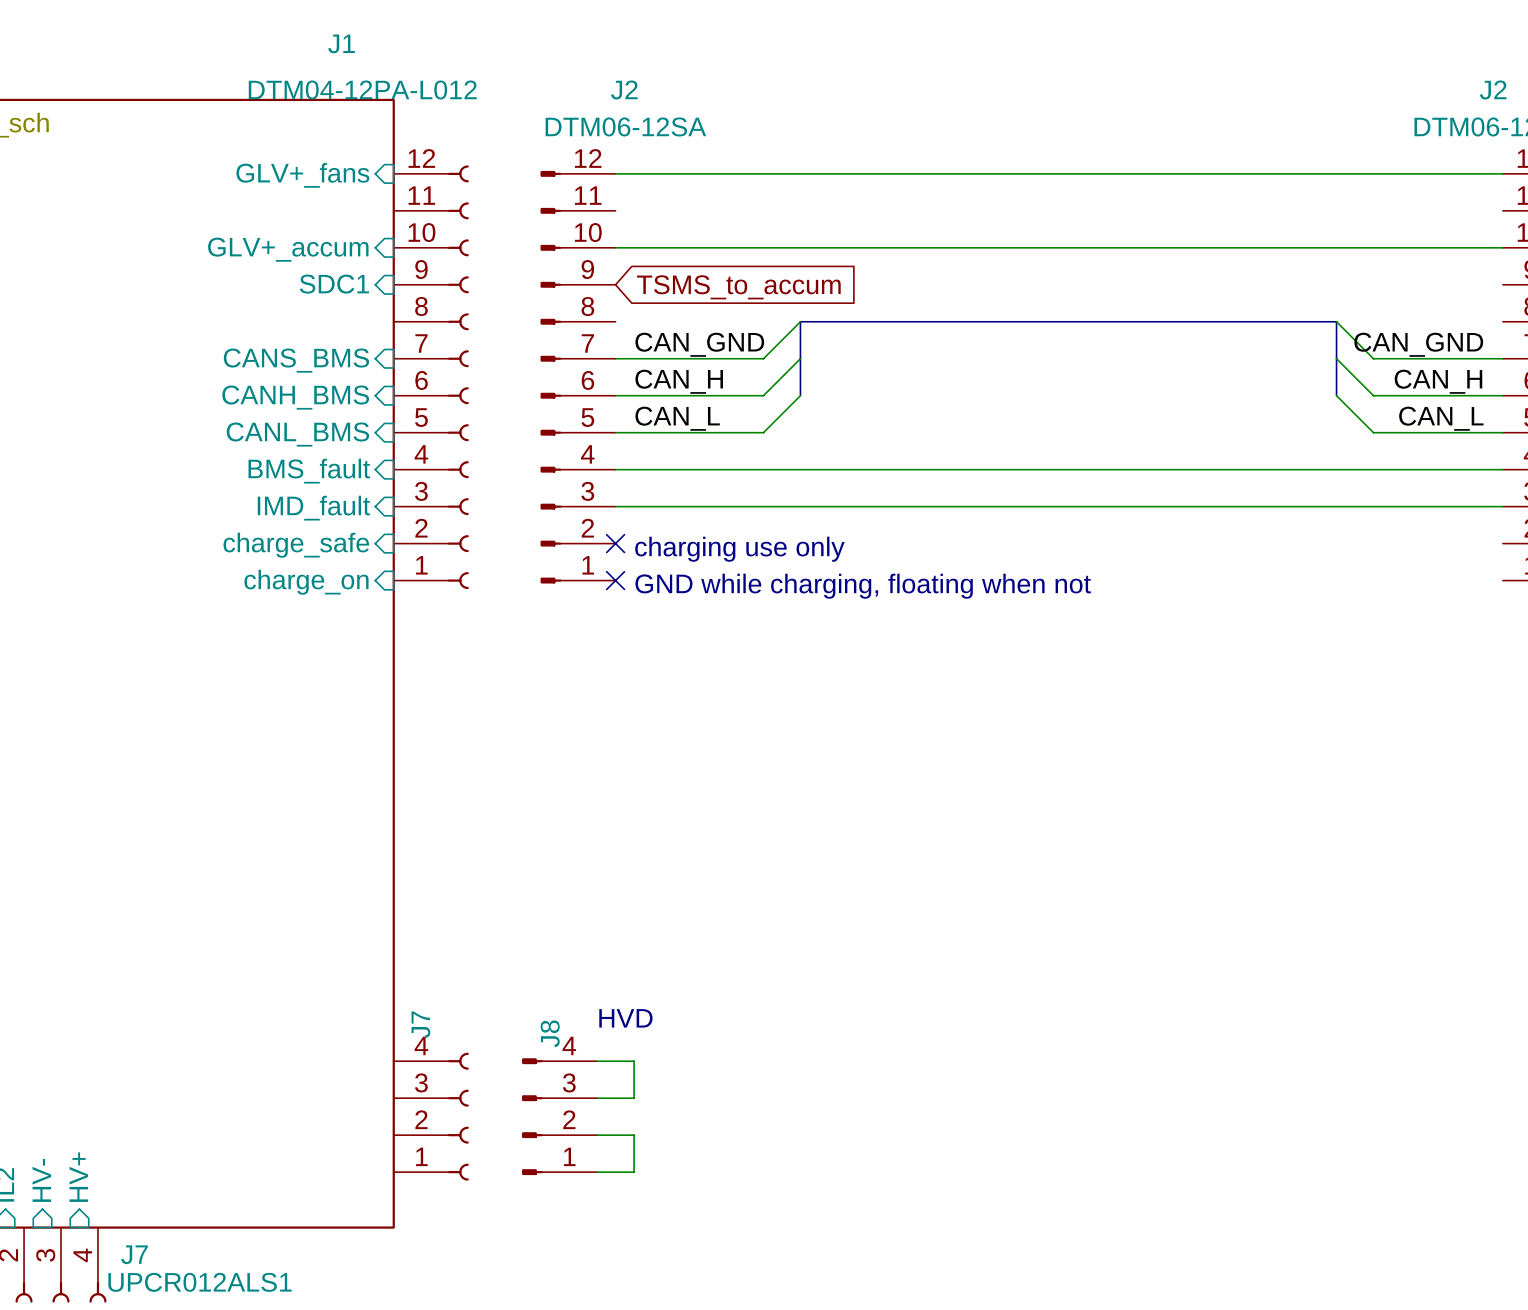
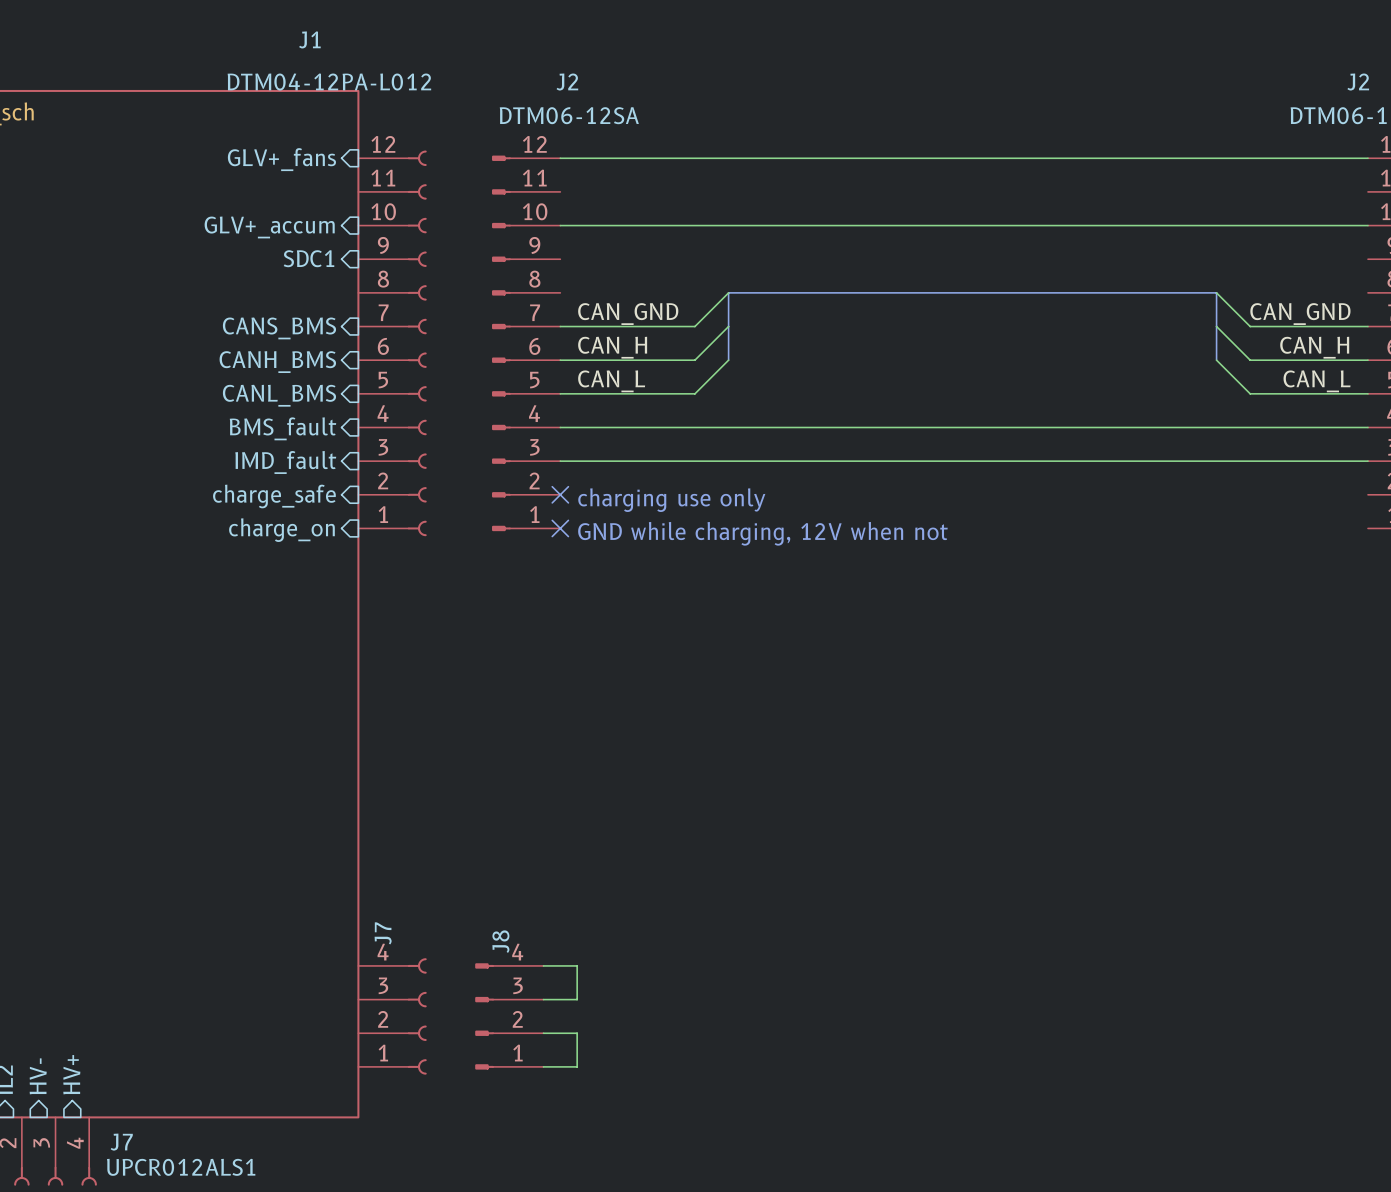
global label: TSMS_to_accum (738, 287) -> none
text: GND while charging, floating when not (863, 586) -> GND while charging, 12V when not (762, 533)
text: HVD (625, 1018) -> none

